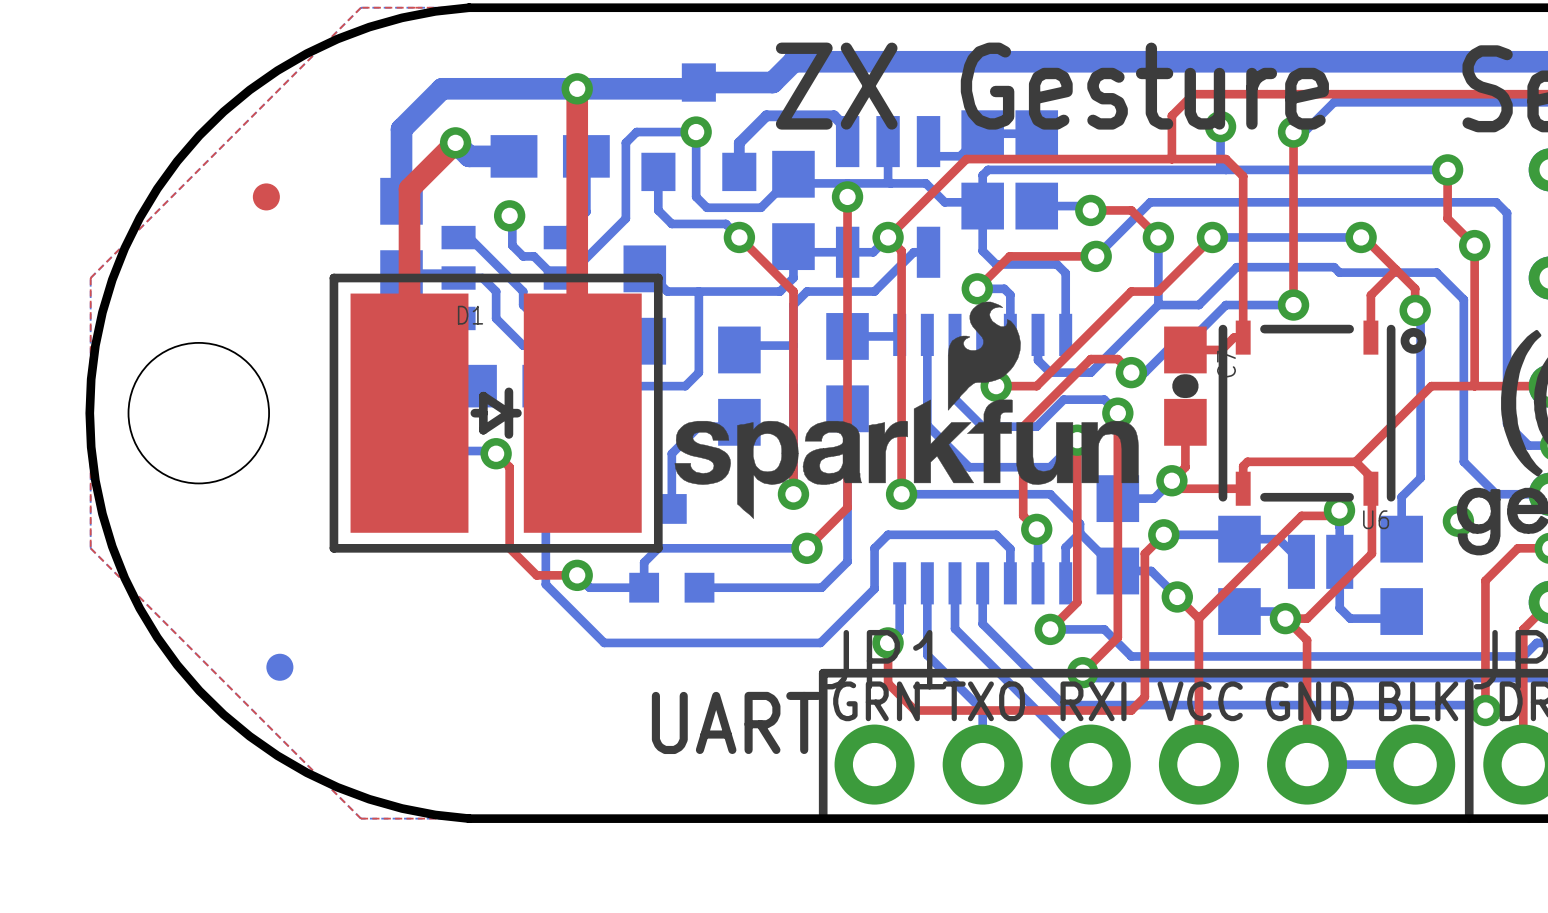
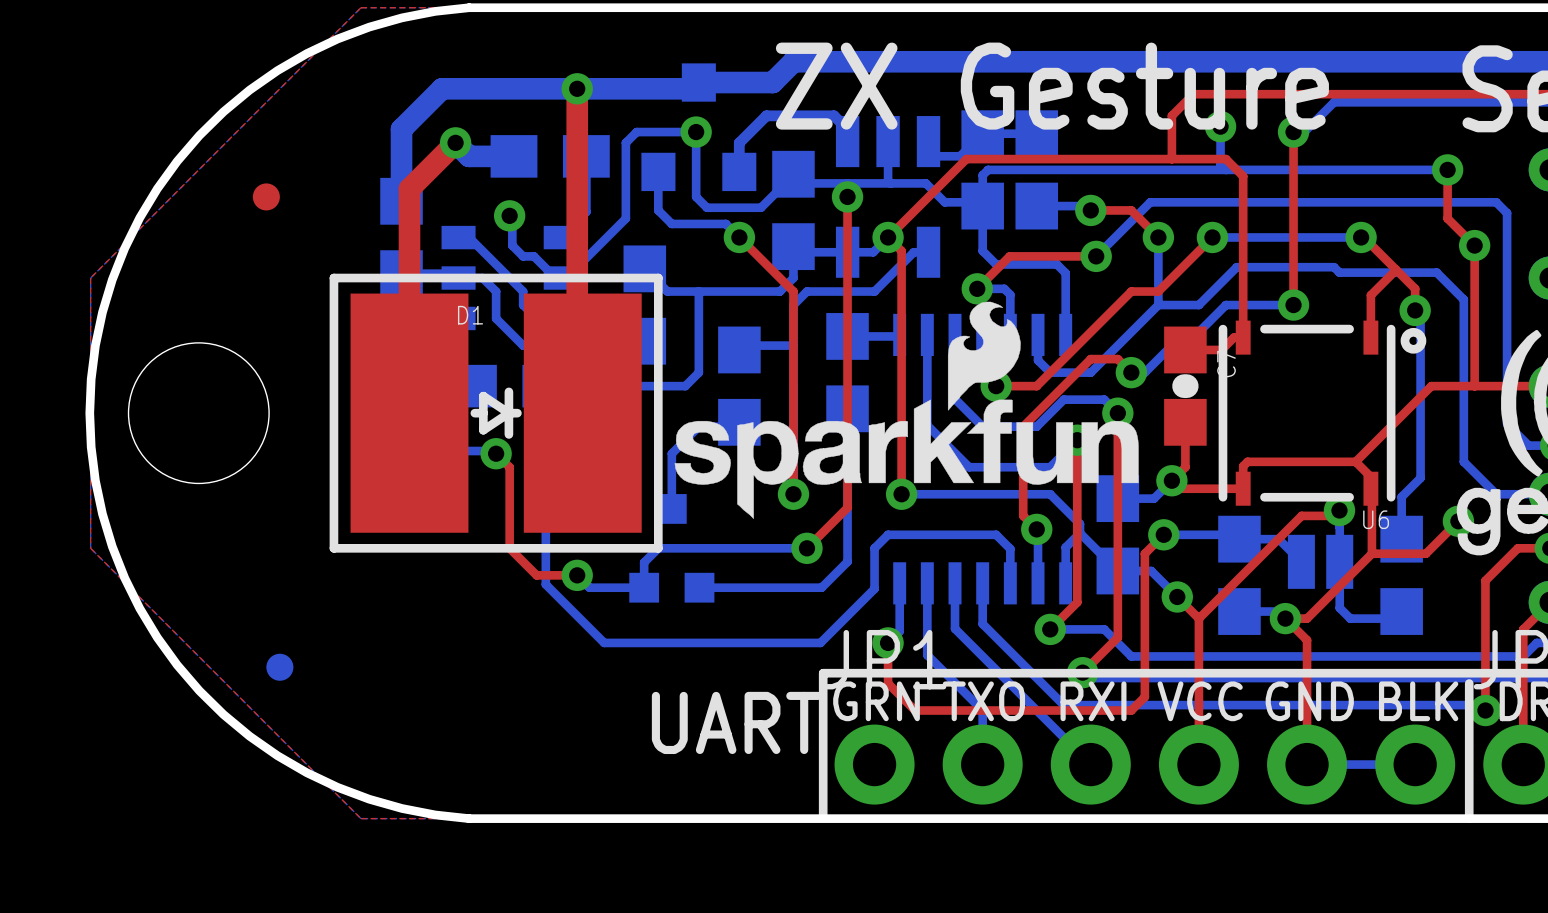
top track: none -> (1458, 521) (1425, 553) (1371, 553)

